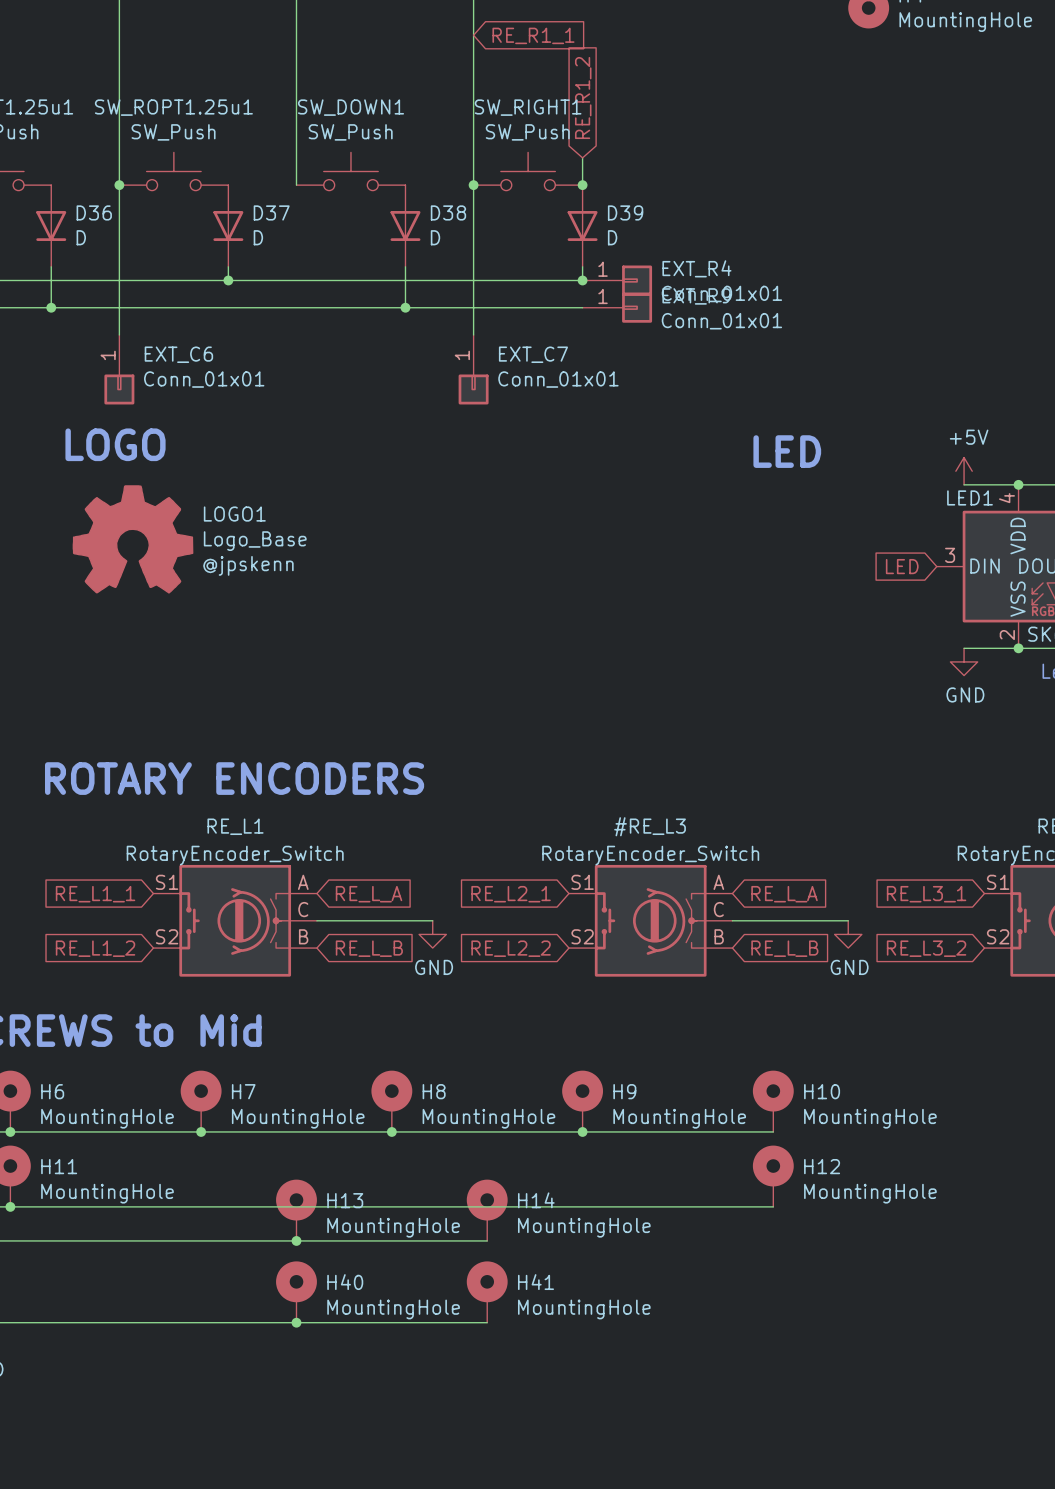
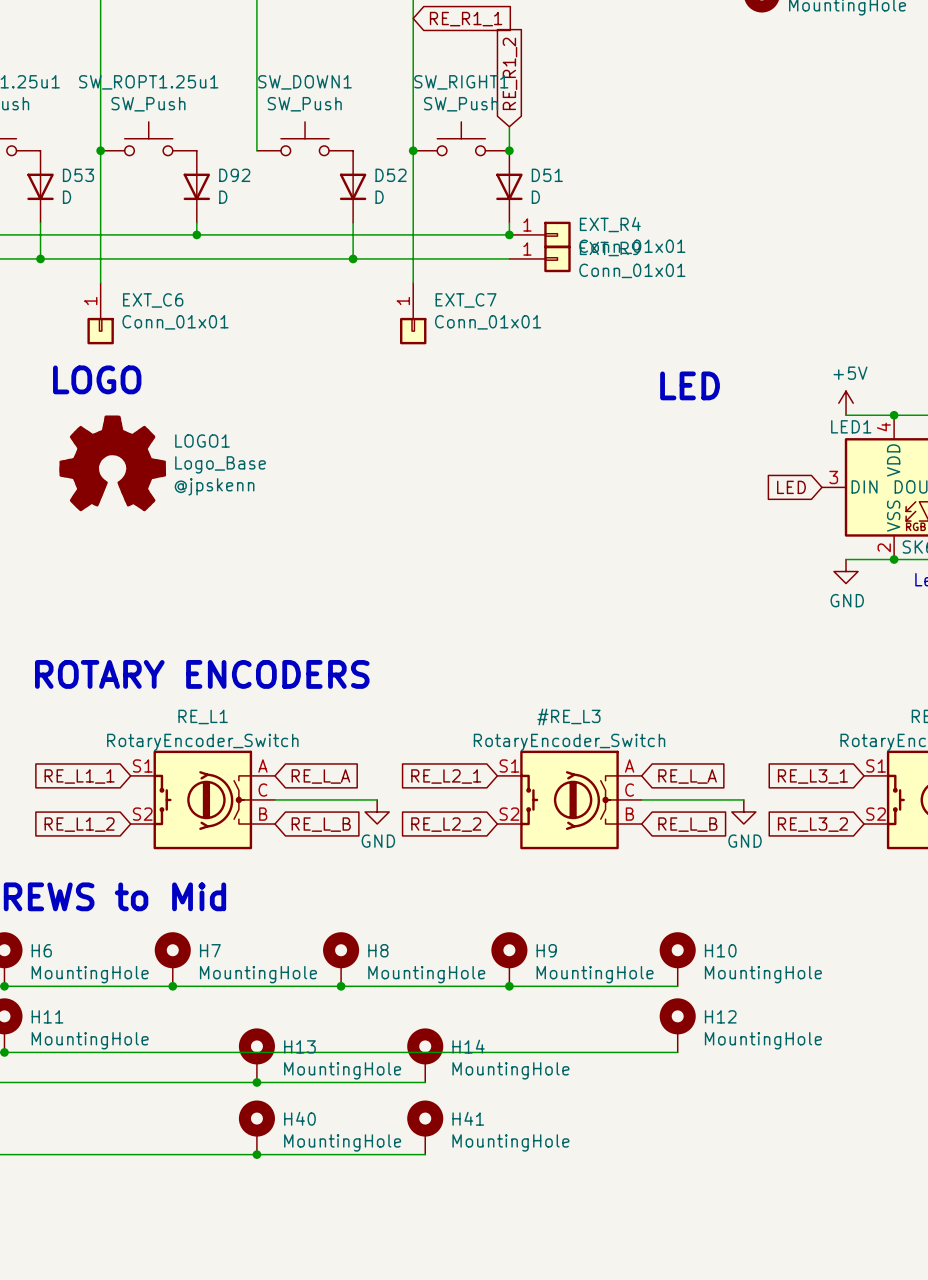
D36 name: D36 (94, 212) -> D53 (78, 175)
D37 name: D37 (271, 212) -> D92 (234, 175)
D38 name: D38 (448, 212) -> D52 (391, 175)
D39 name: D39 (625, 212) -> D51 (547, 175)

